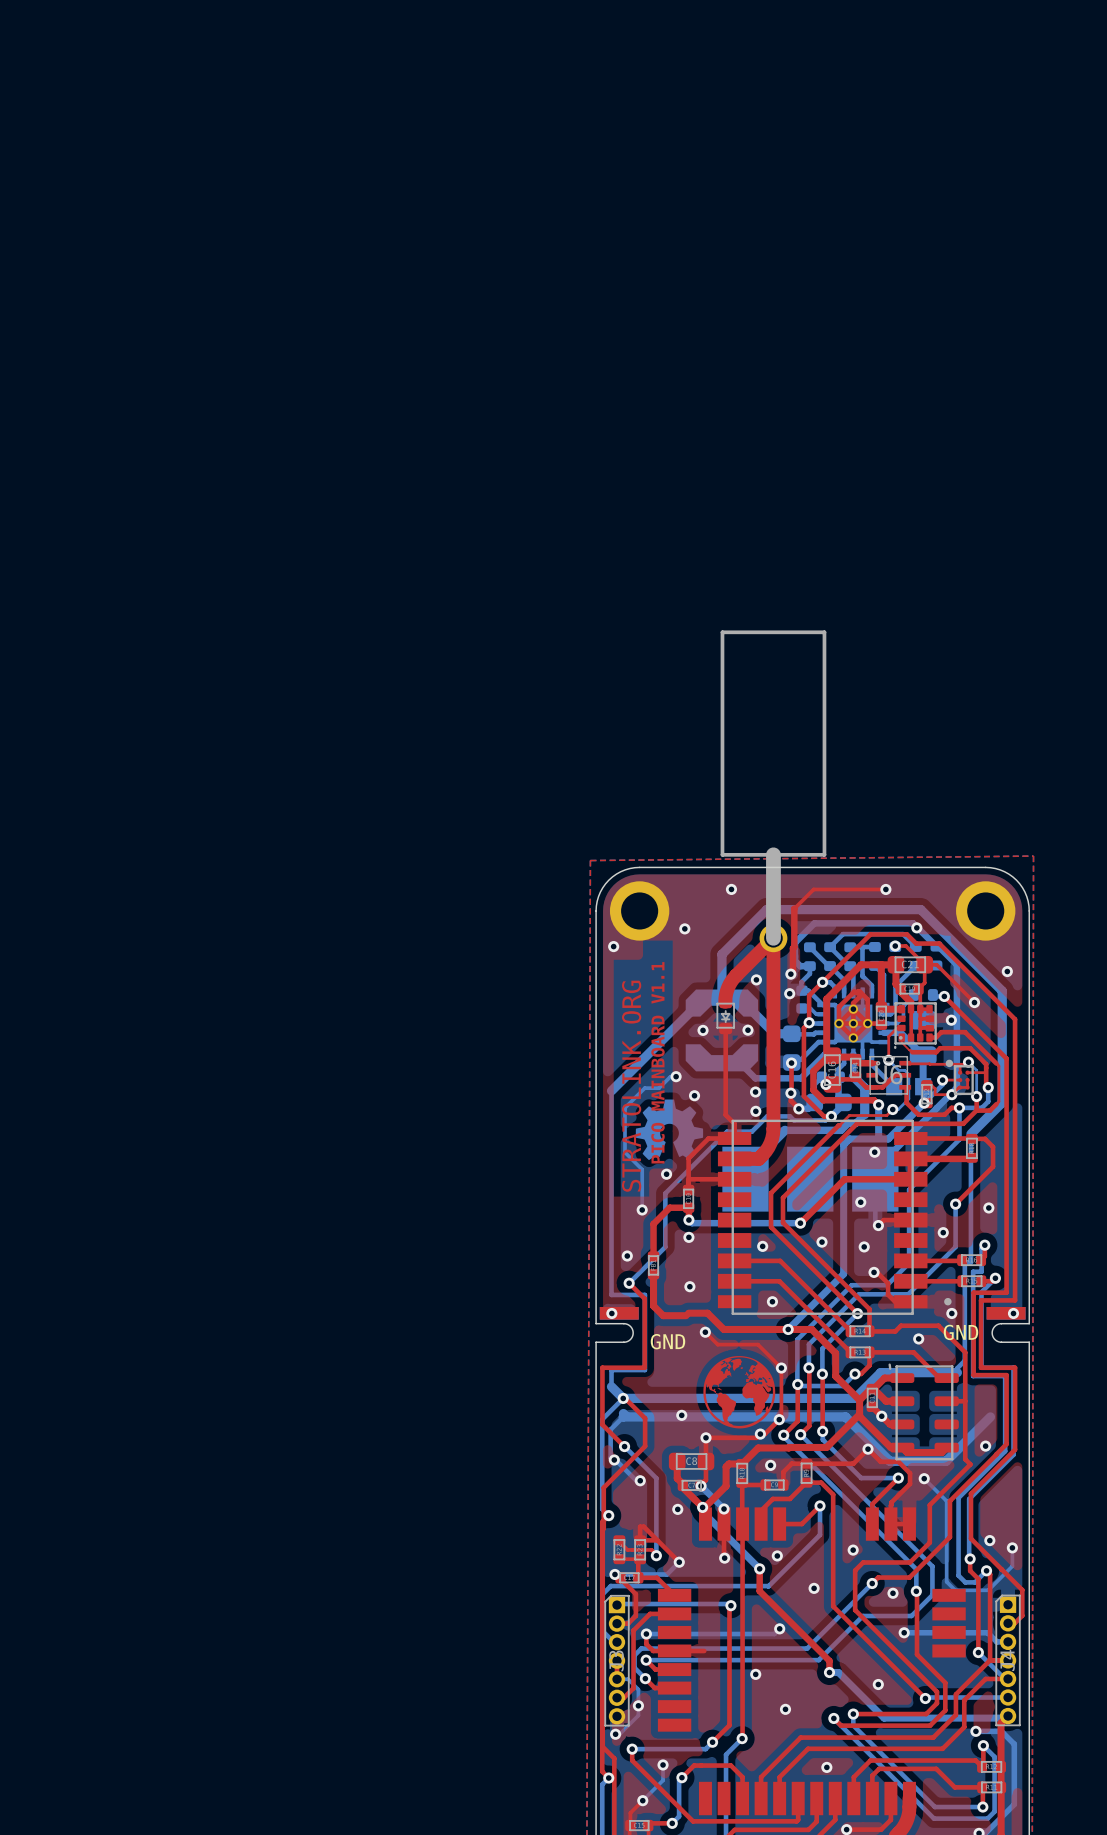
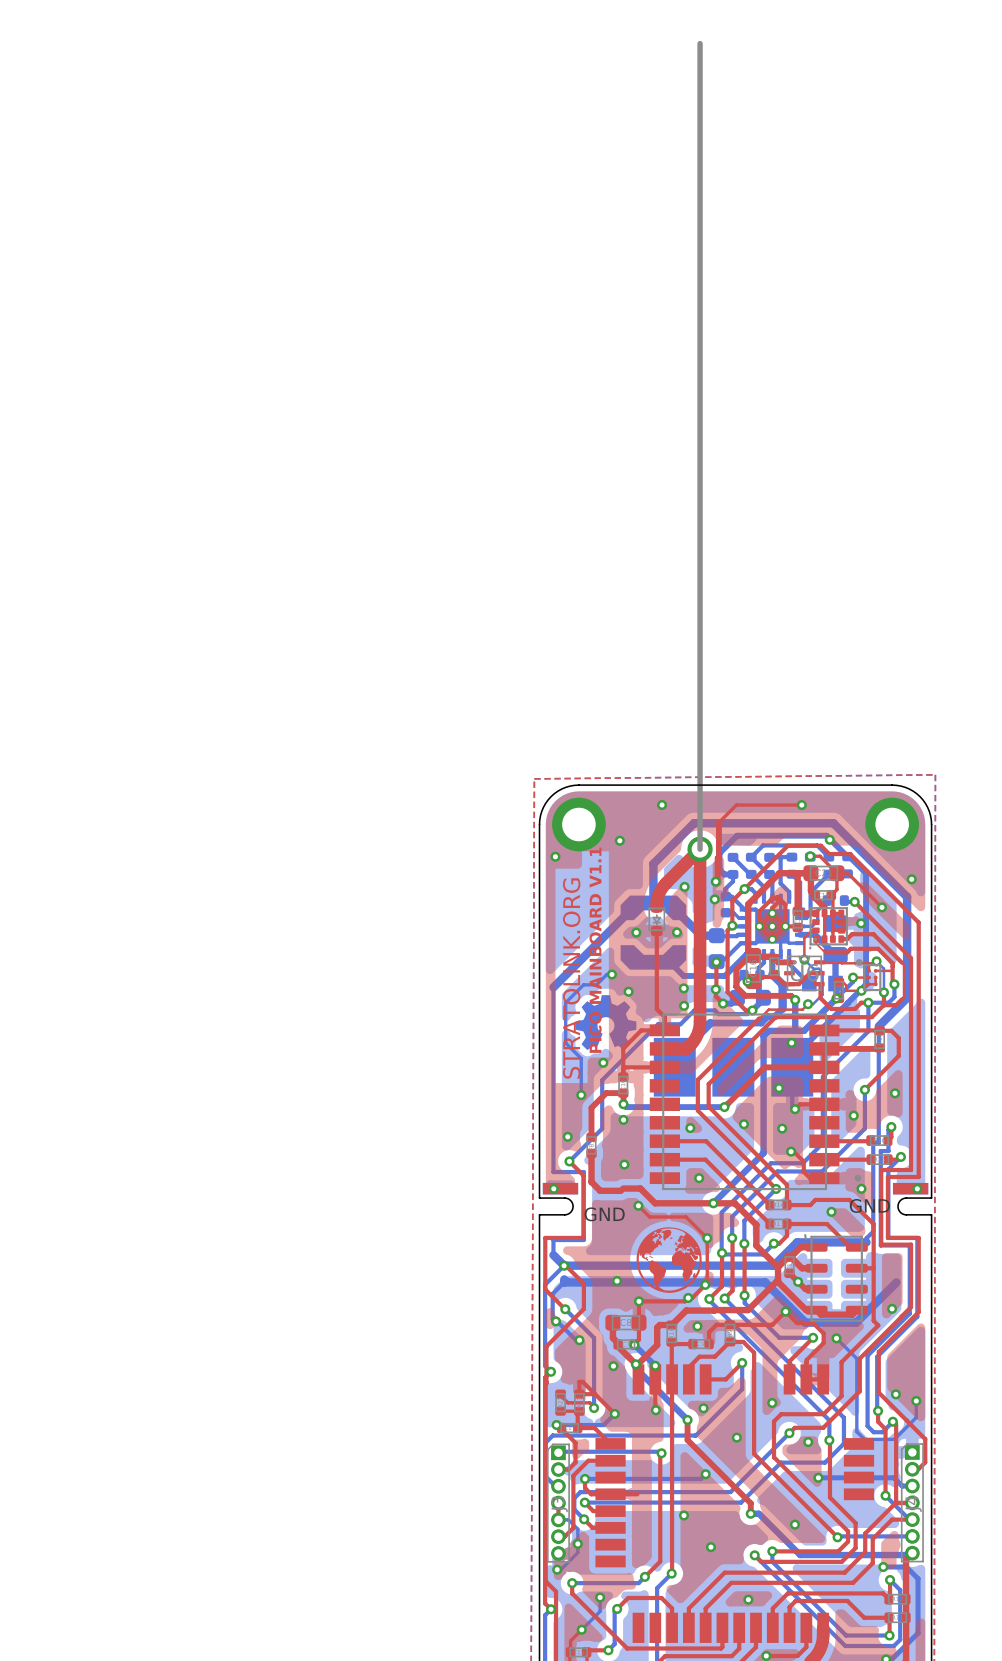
part: none -> (700, 451)
part: (773, 791) -> none

